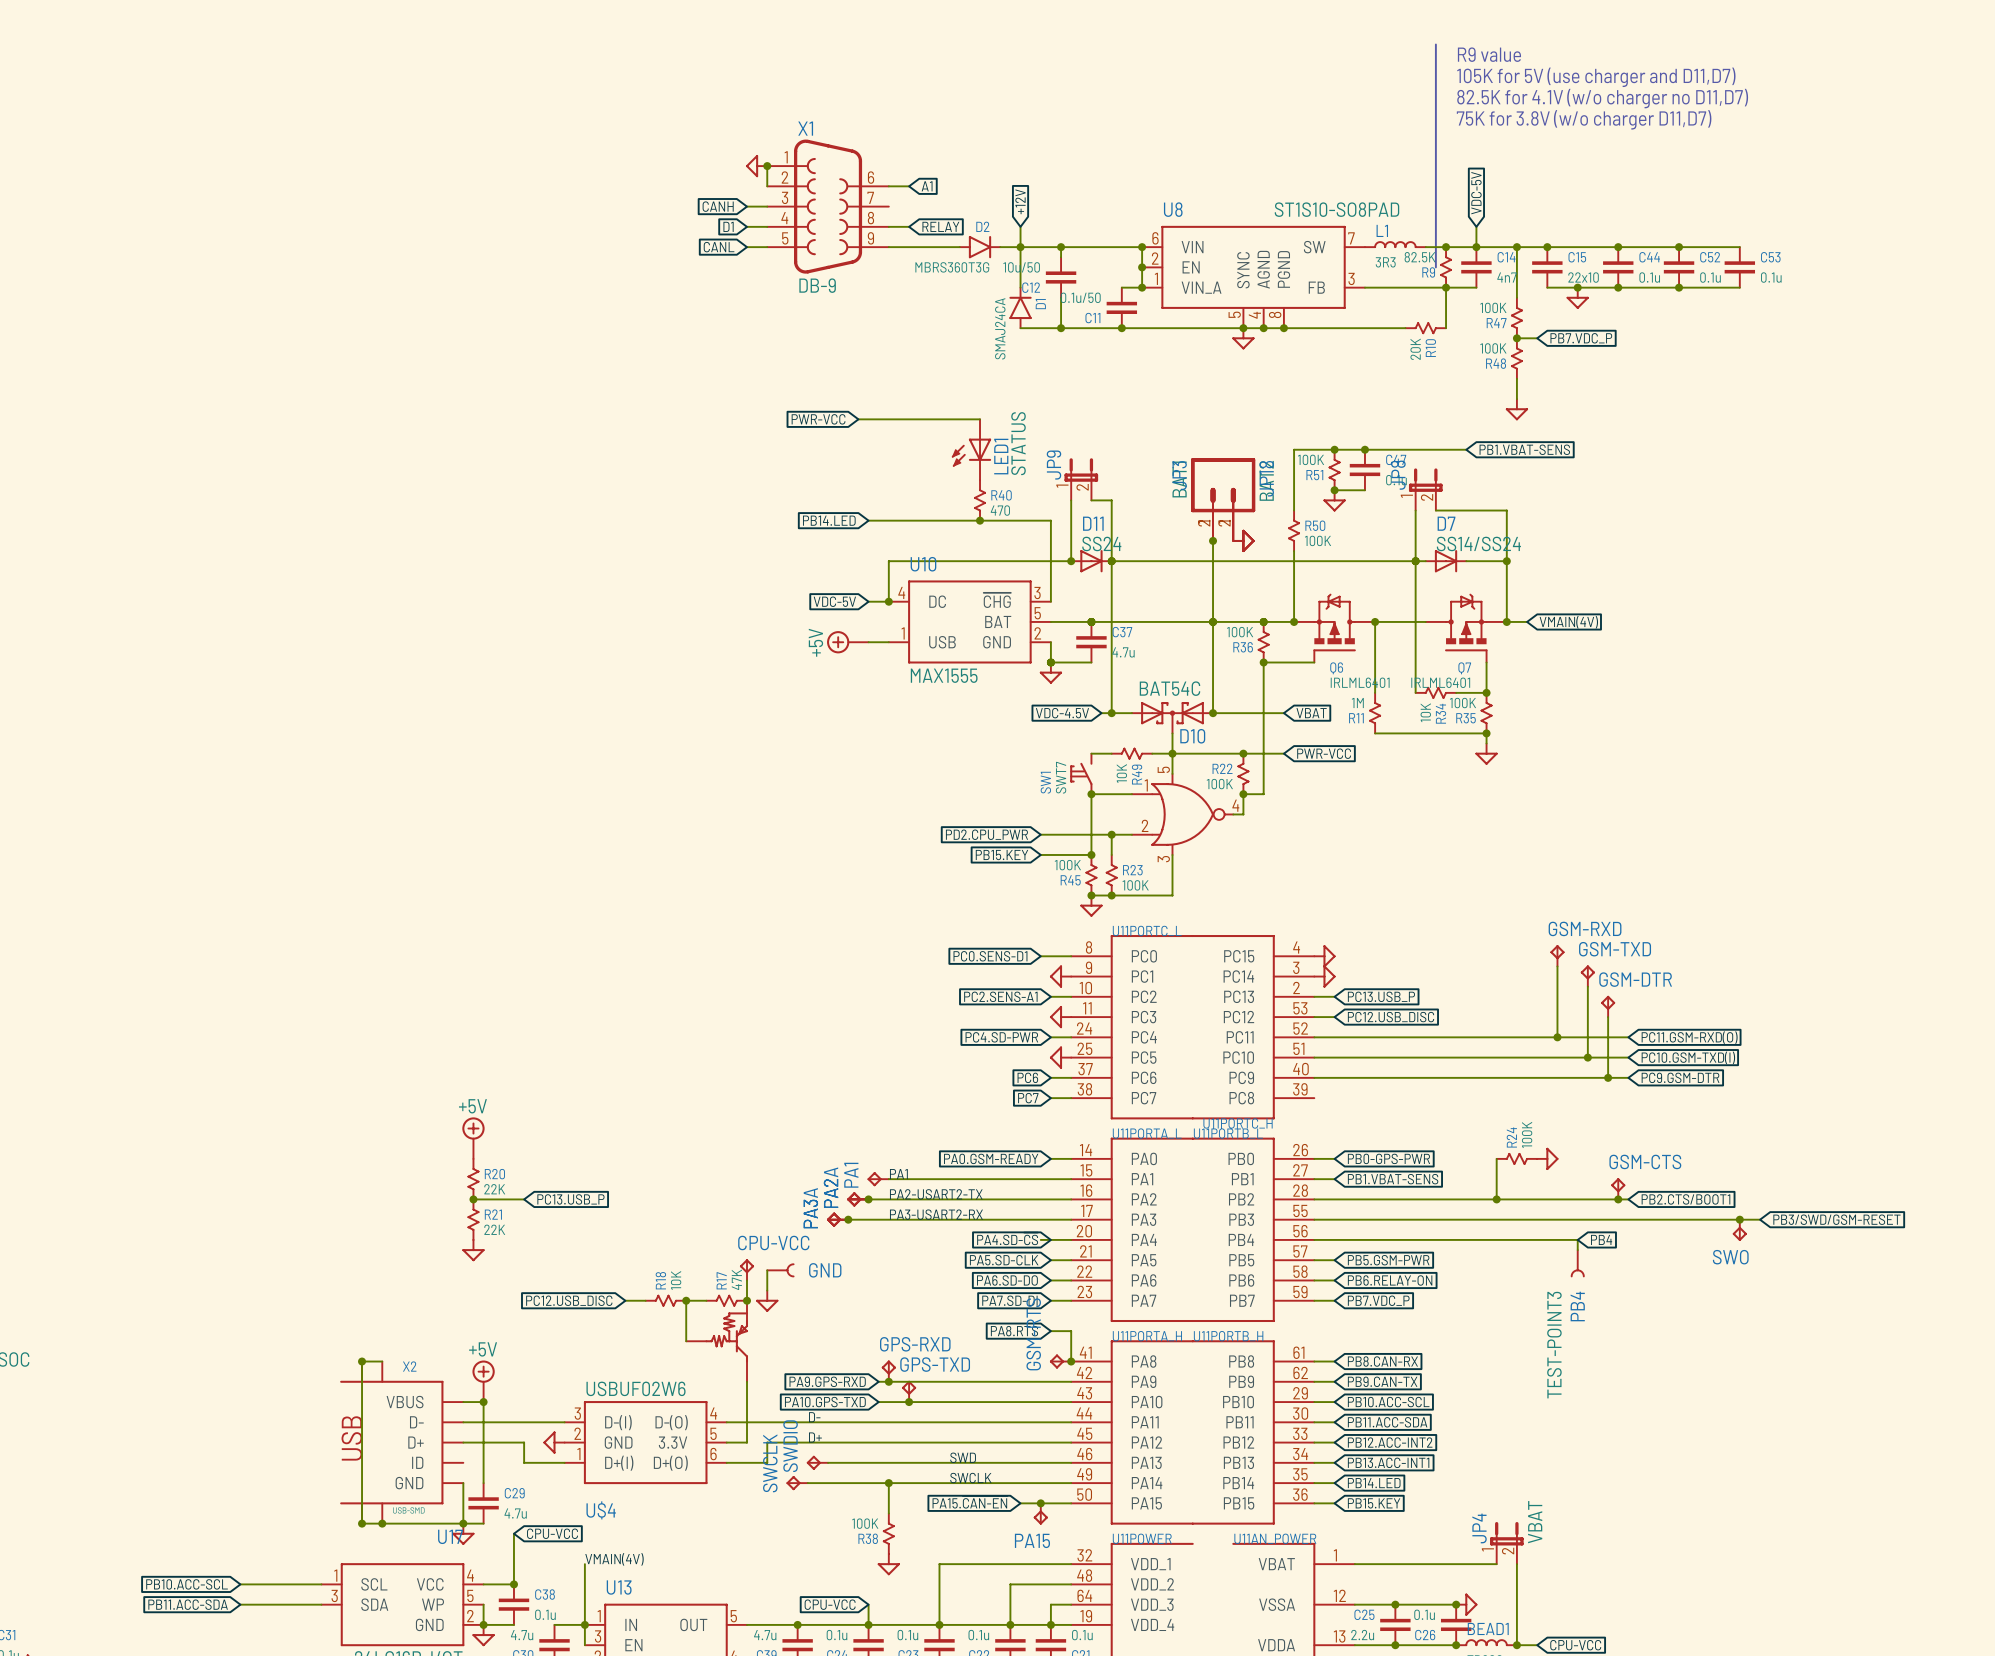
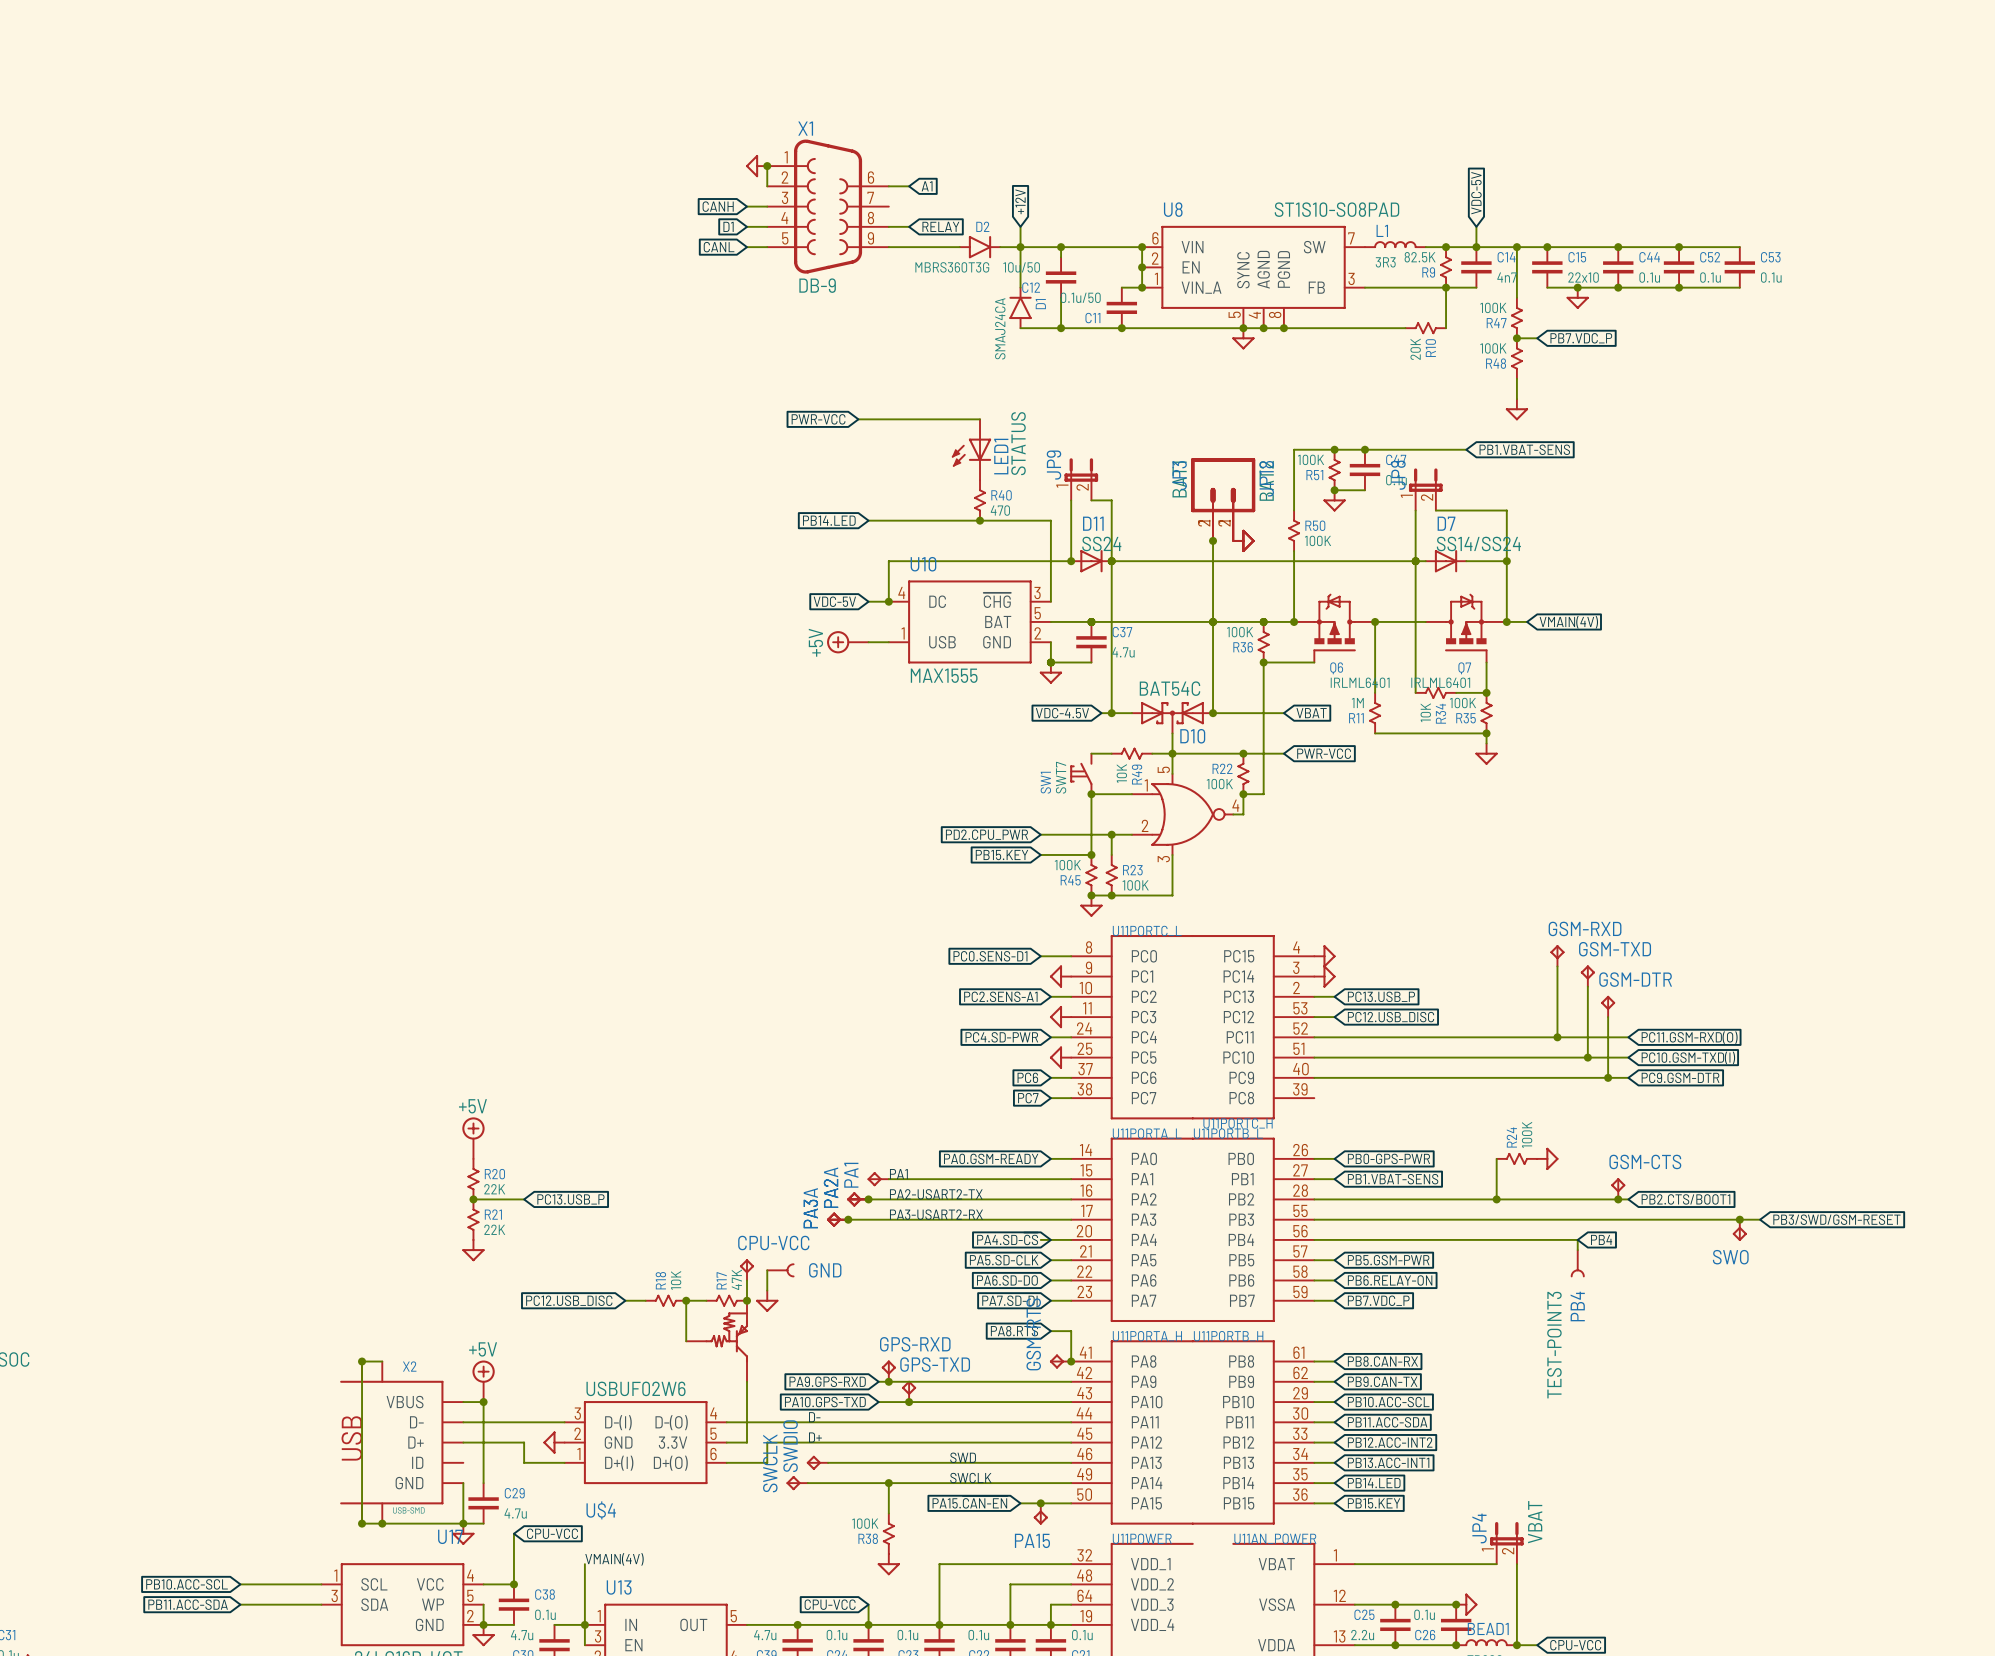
line: (1435, 44) (1435, 267) -> none
text: R9 value (1489, 54) -> none
text: 105K for 5V (use charger and D11,D7) (1596, 77) -> none
text: 82.5K for 4.1V (w/o charger no D11,D7) (1602, 98) -> none
text: 75K for 3.8V (w/o charger D11,D7) (1584, 119) -> none

